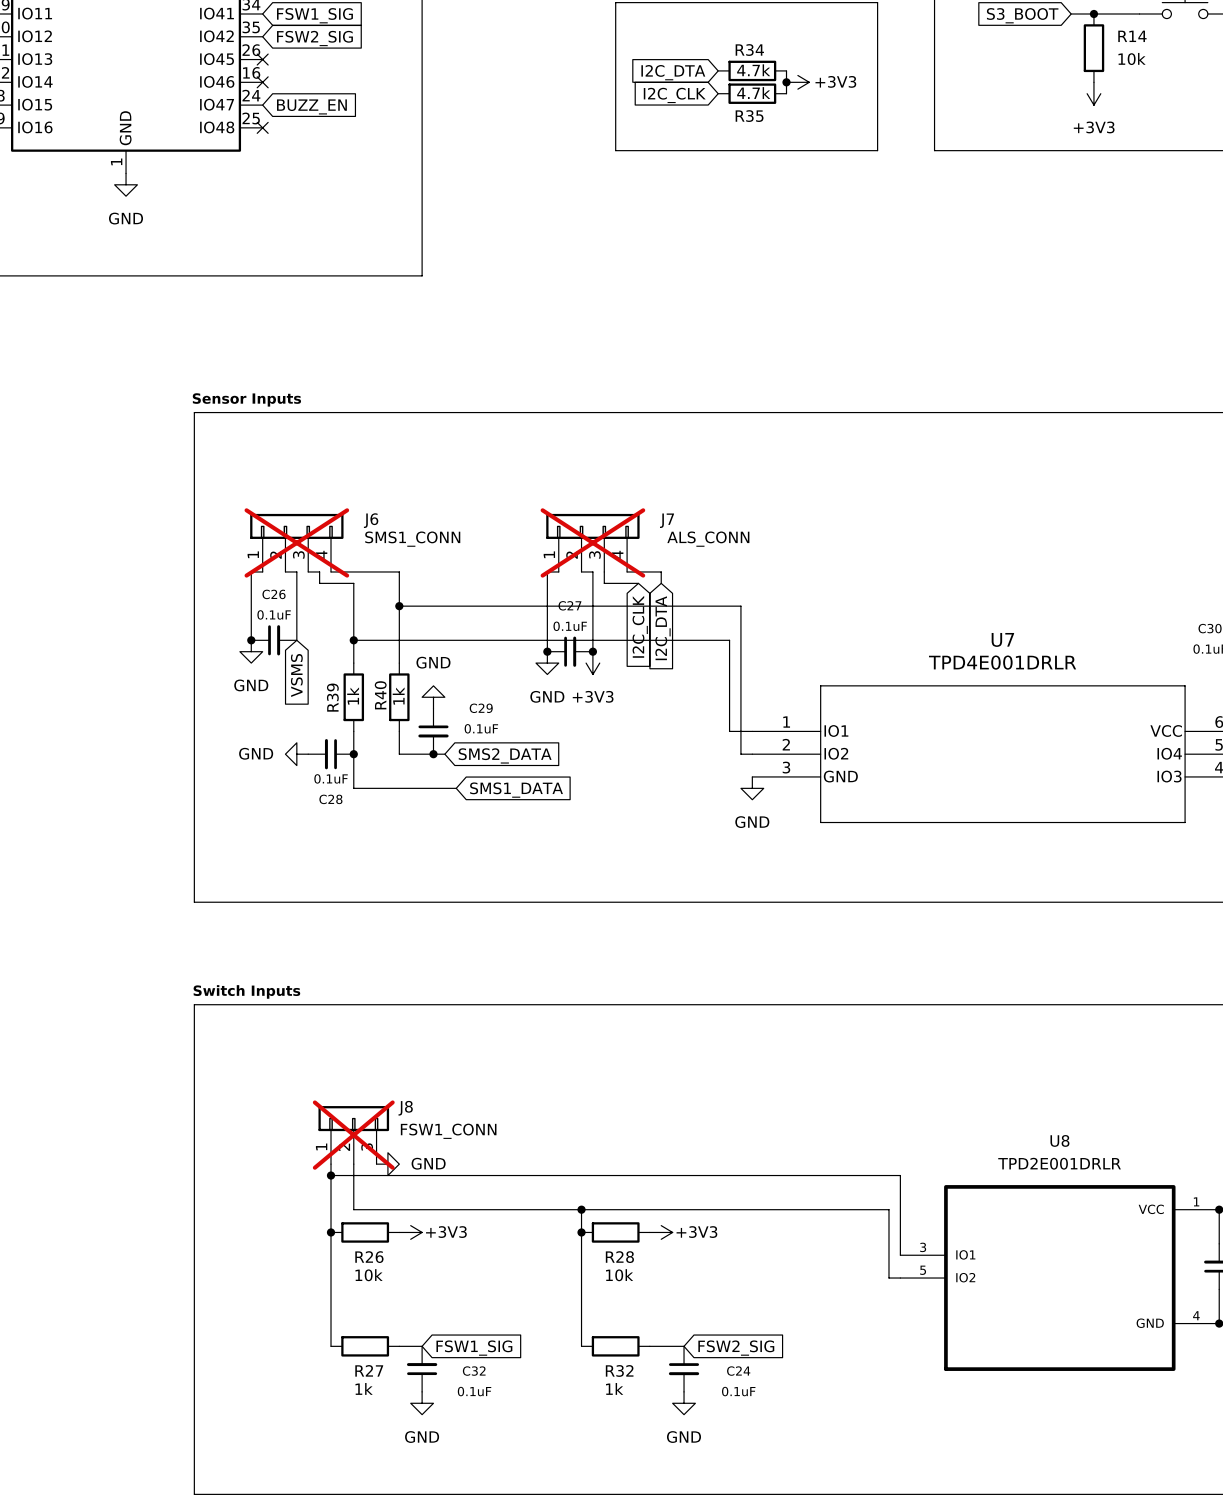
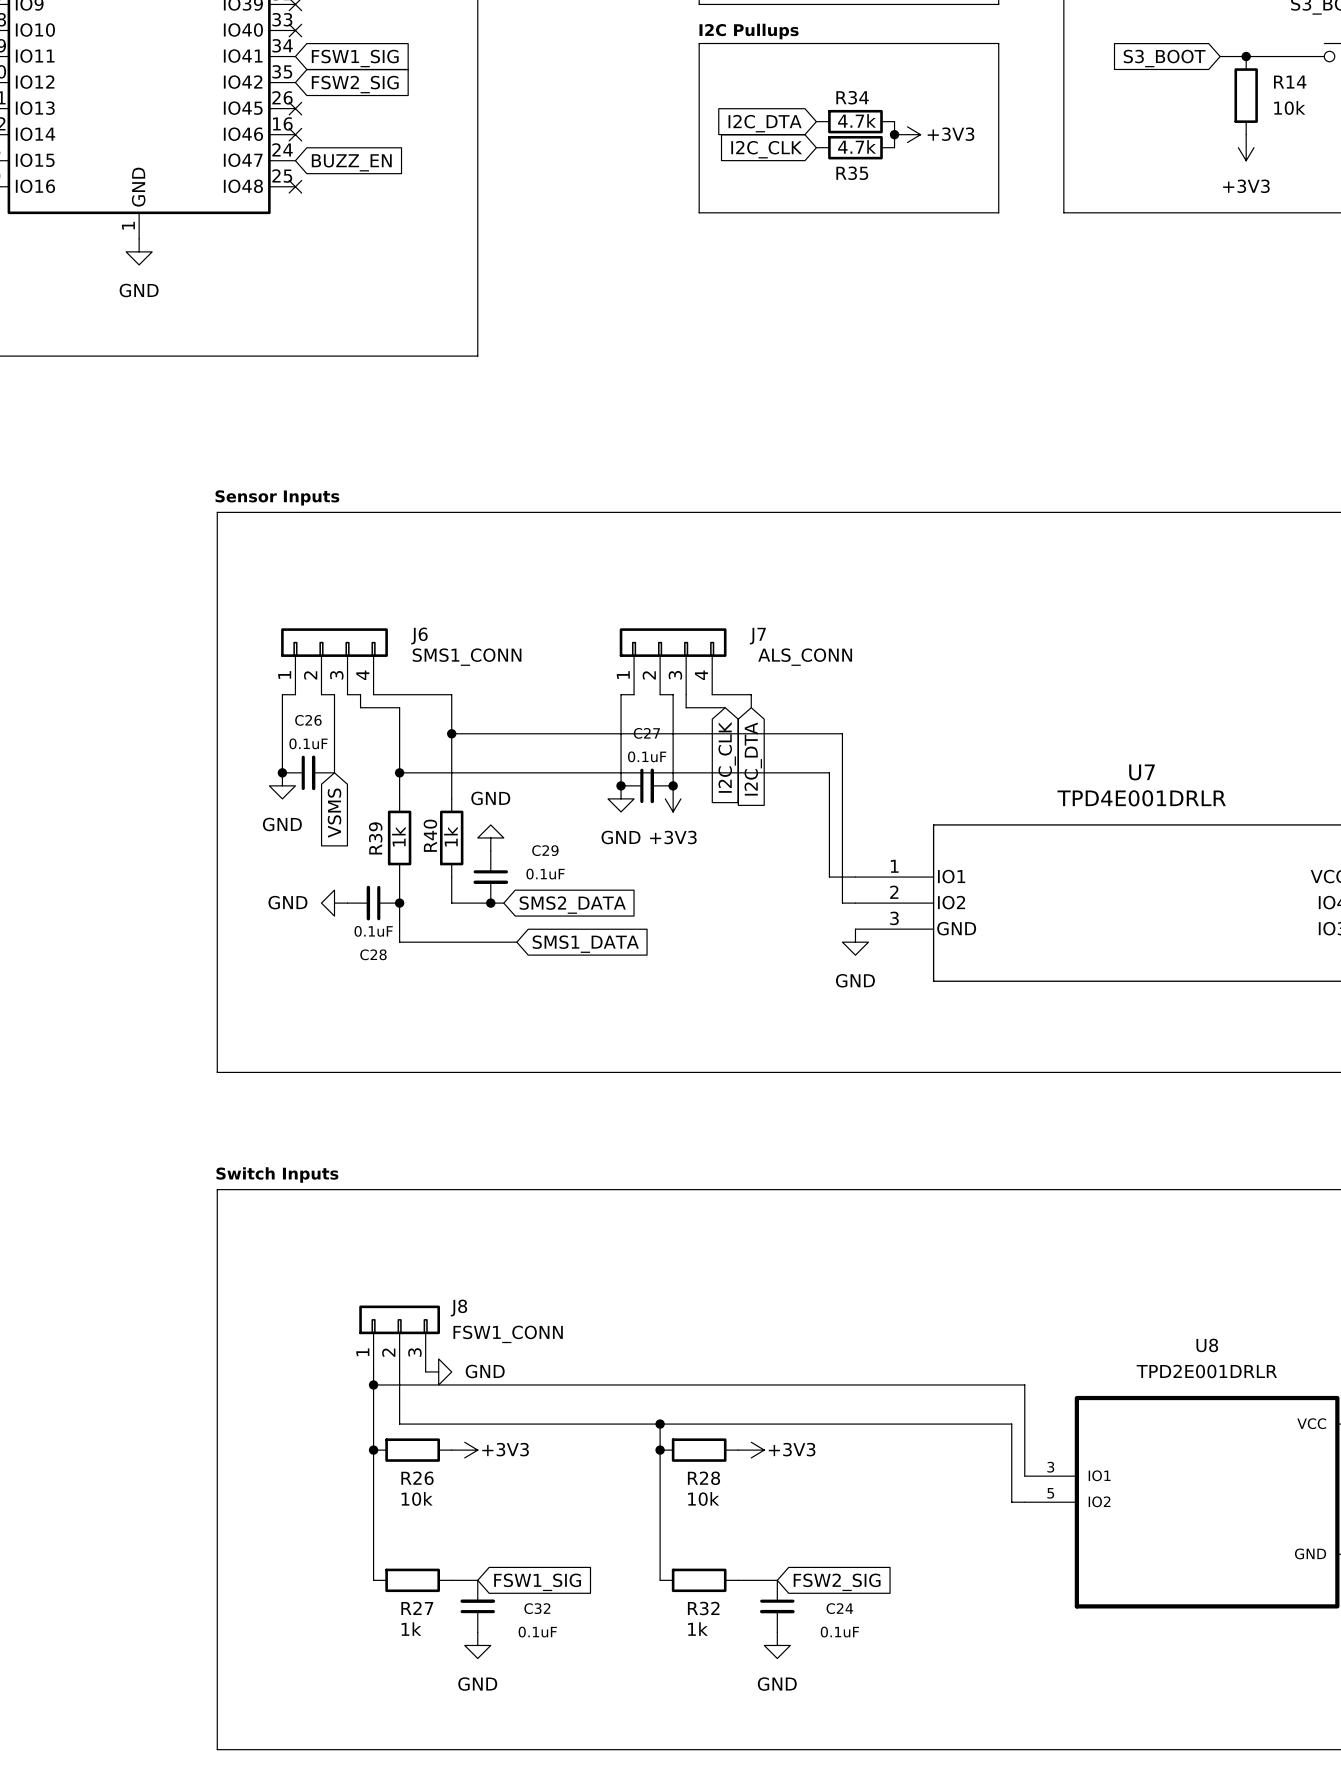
J6 do-not-place cross: (296, 542) -> none
J7 do-not-place cross: (592, 542) -> none
J8 do-not-place cross: (353, 1135) -> none

